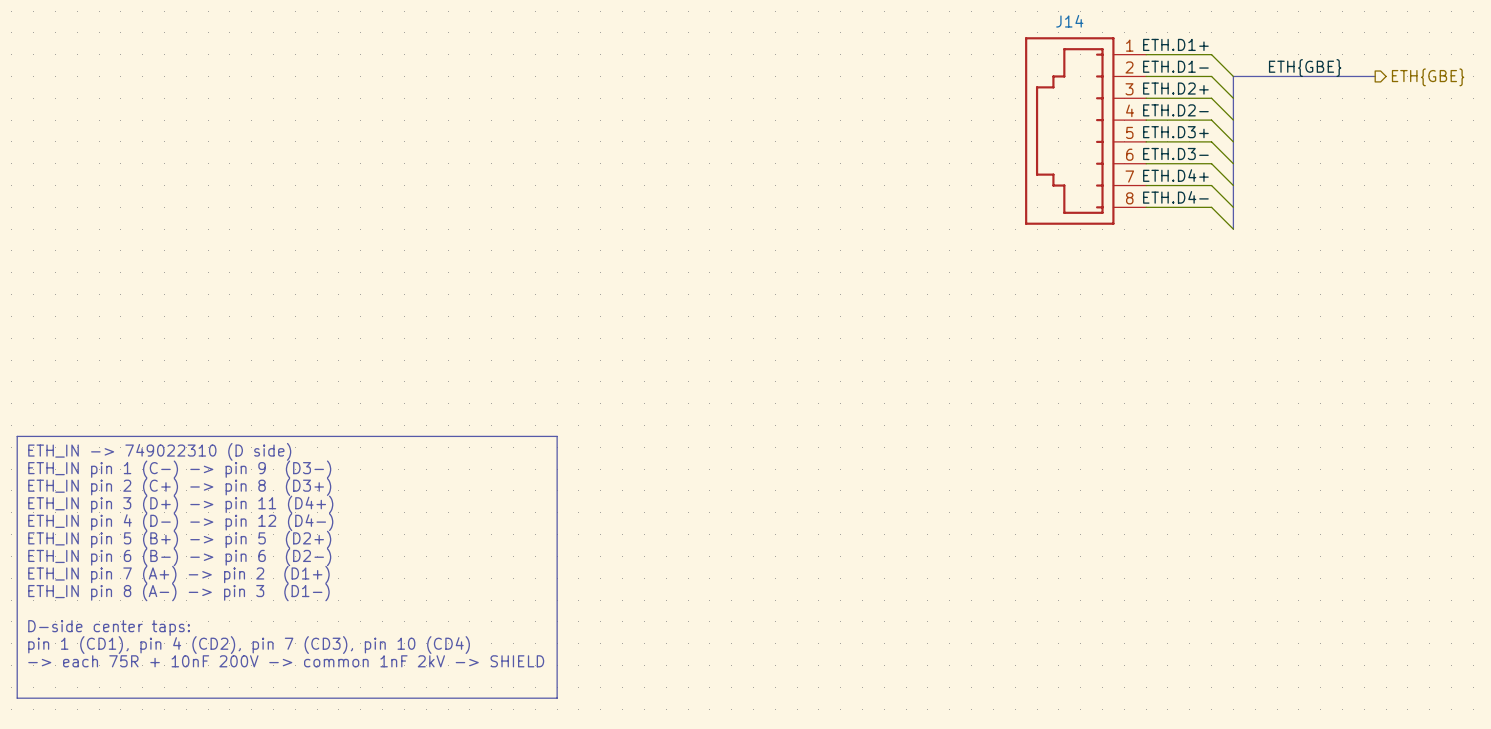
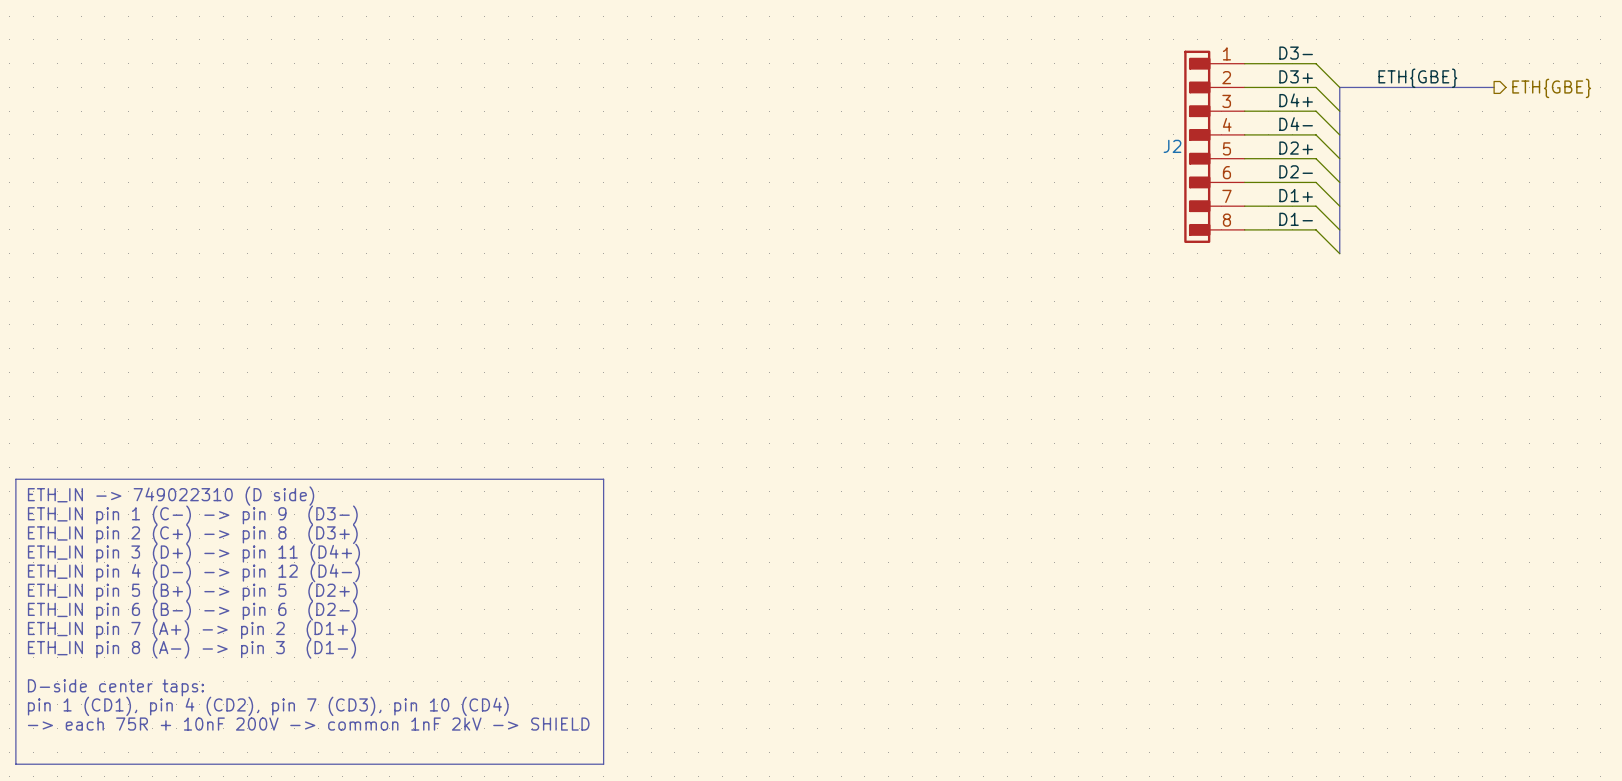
label: ETH.D1+ (1175, 44) -> D3- (1296, 53)
label: ETH.D1- (1175, 66) -> D3+ (1296, 76)
label: ETH.D2+ (1175, 88) -> D4+ (1296, 100)
label: ETH.D2- (1175, 110) -> D4- (1296, 124)
J14: (1085, 131) -> none
J2: none -> (1214, 146)
label: ETH.D3+ (1175, 132) -> D2+ (1296, 148)
label: ETH.D3- (1175, 153) -> D2- (1296, 171)
label: ETH.D4+ (1175, 175) -> D1+ (1296, 195)
label: ETH.D4- (1175, 197) -> D1- (1296, 219)

